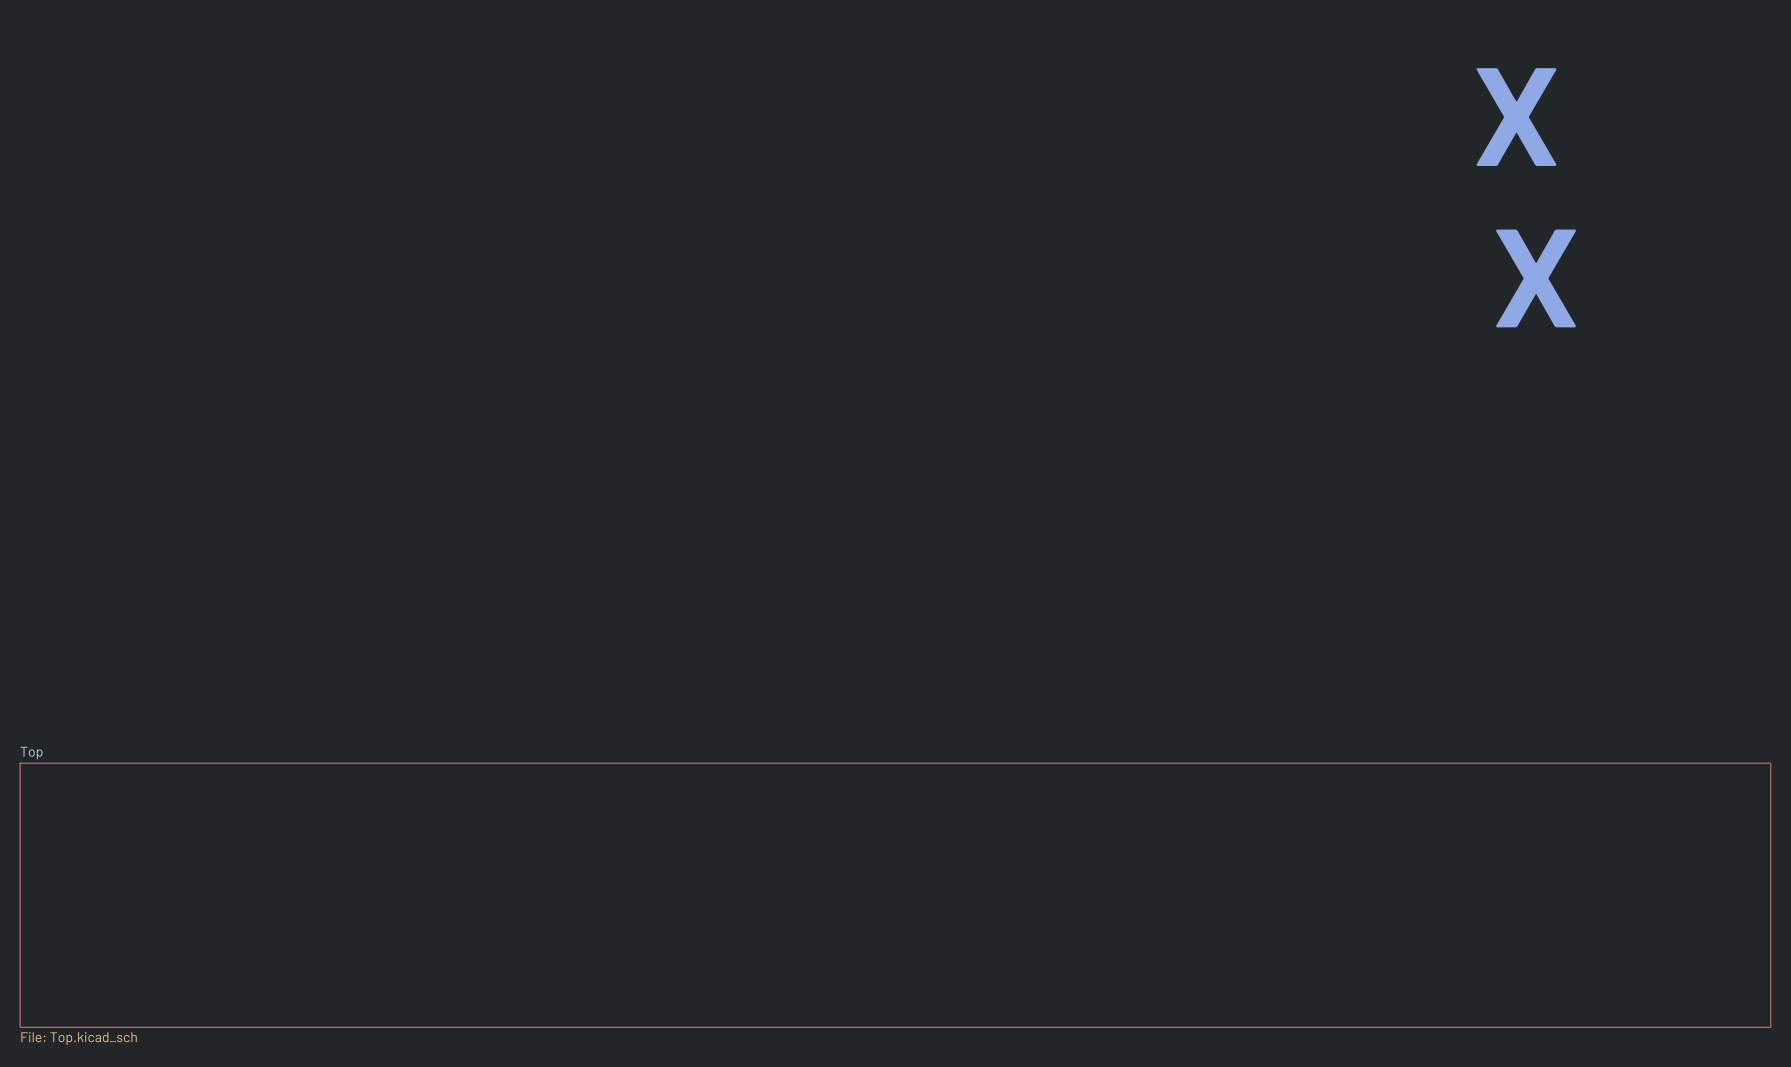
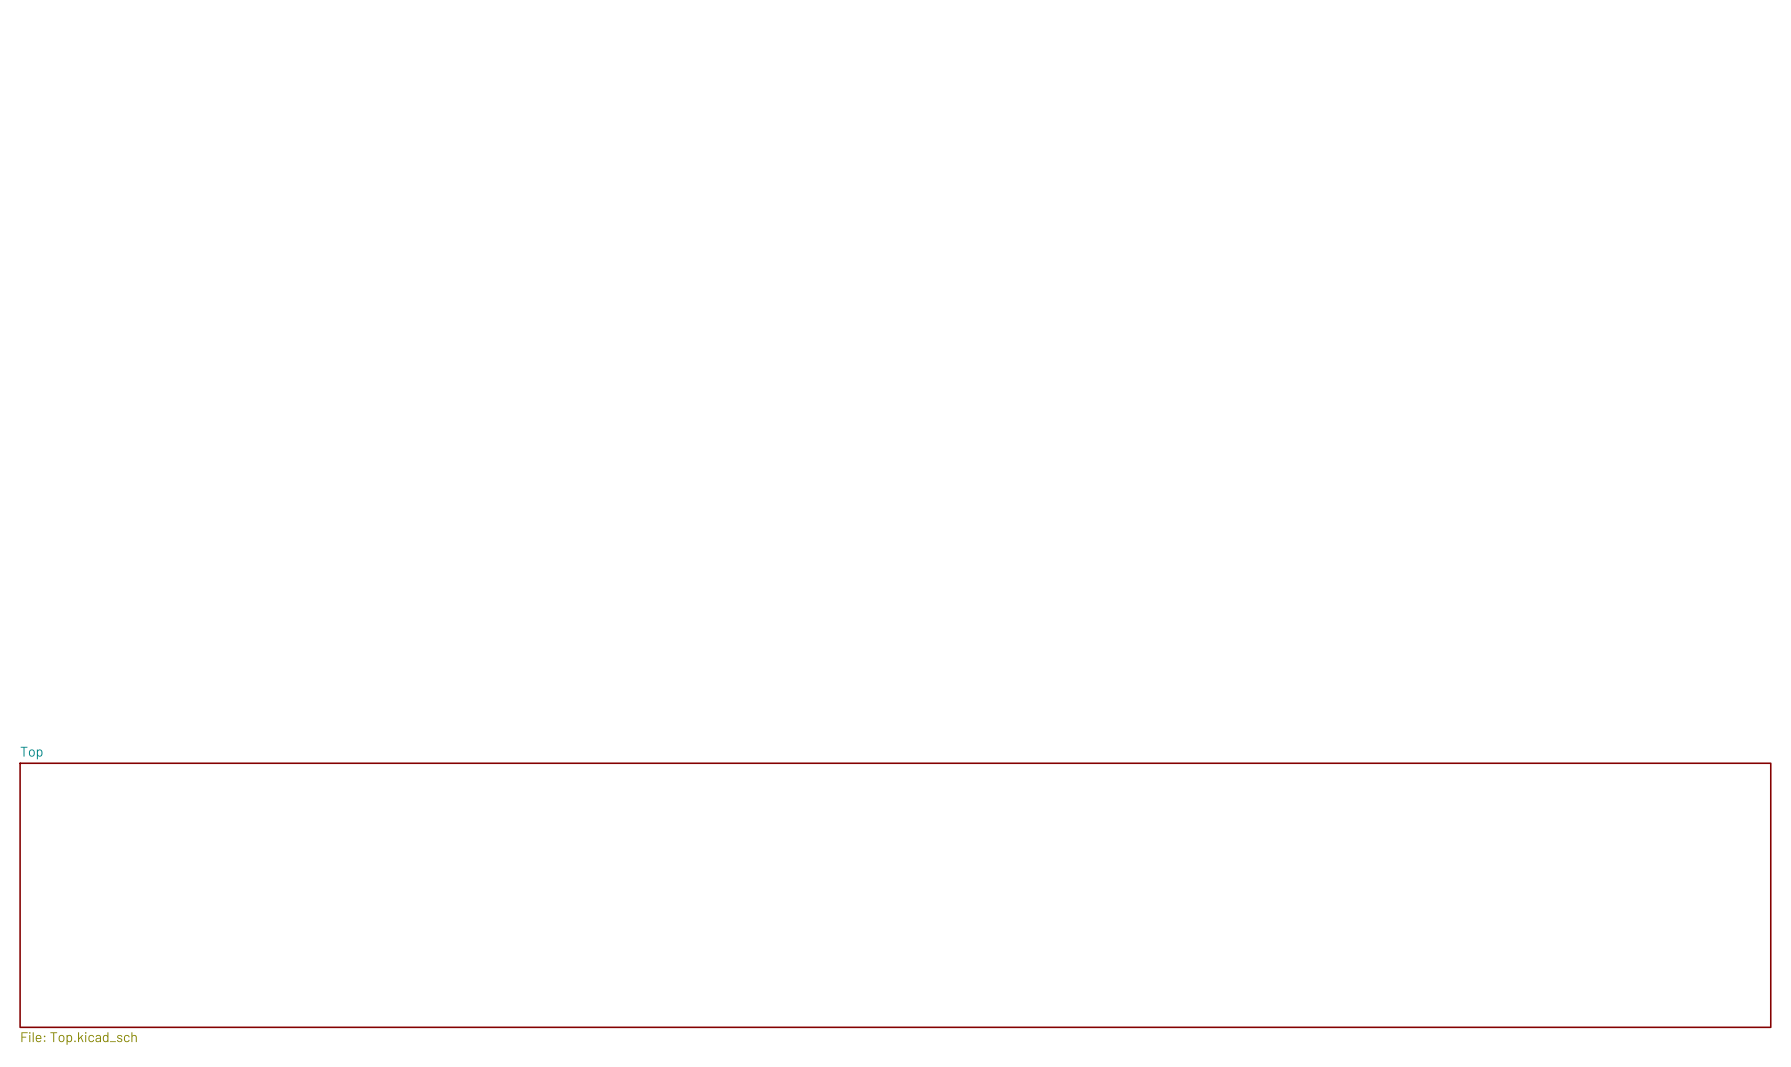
text: X (1516, 117) -> none
text: X (1536, 278) -> none

